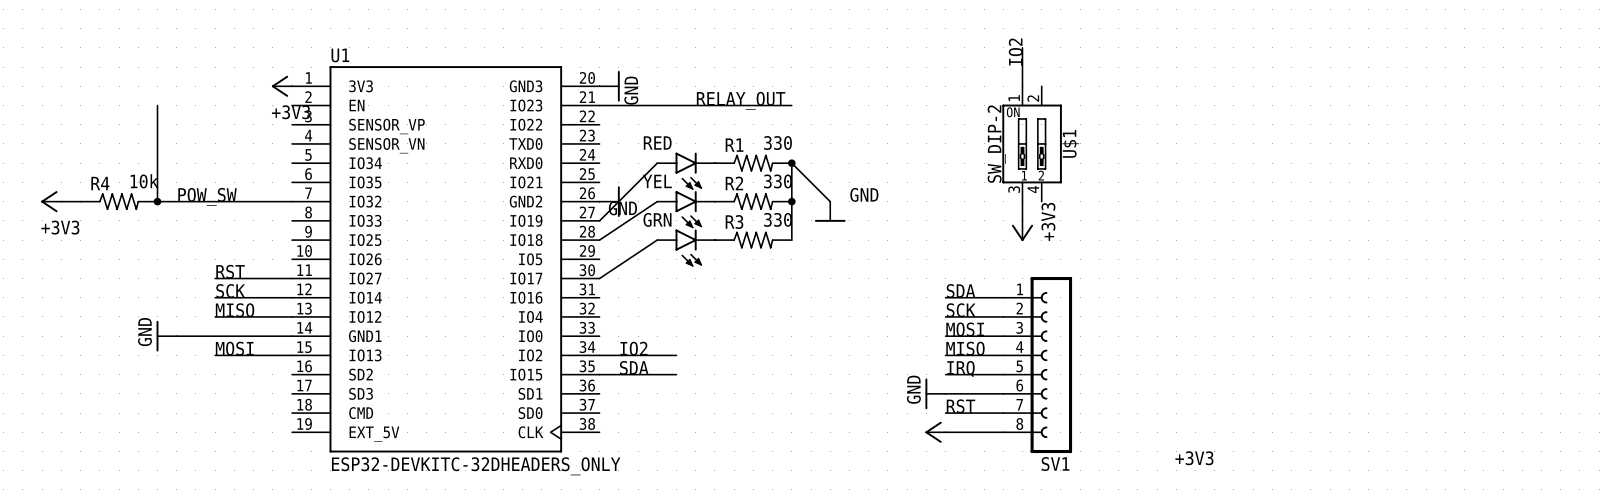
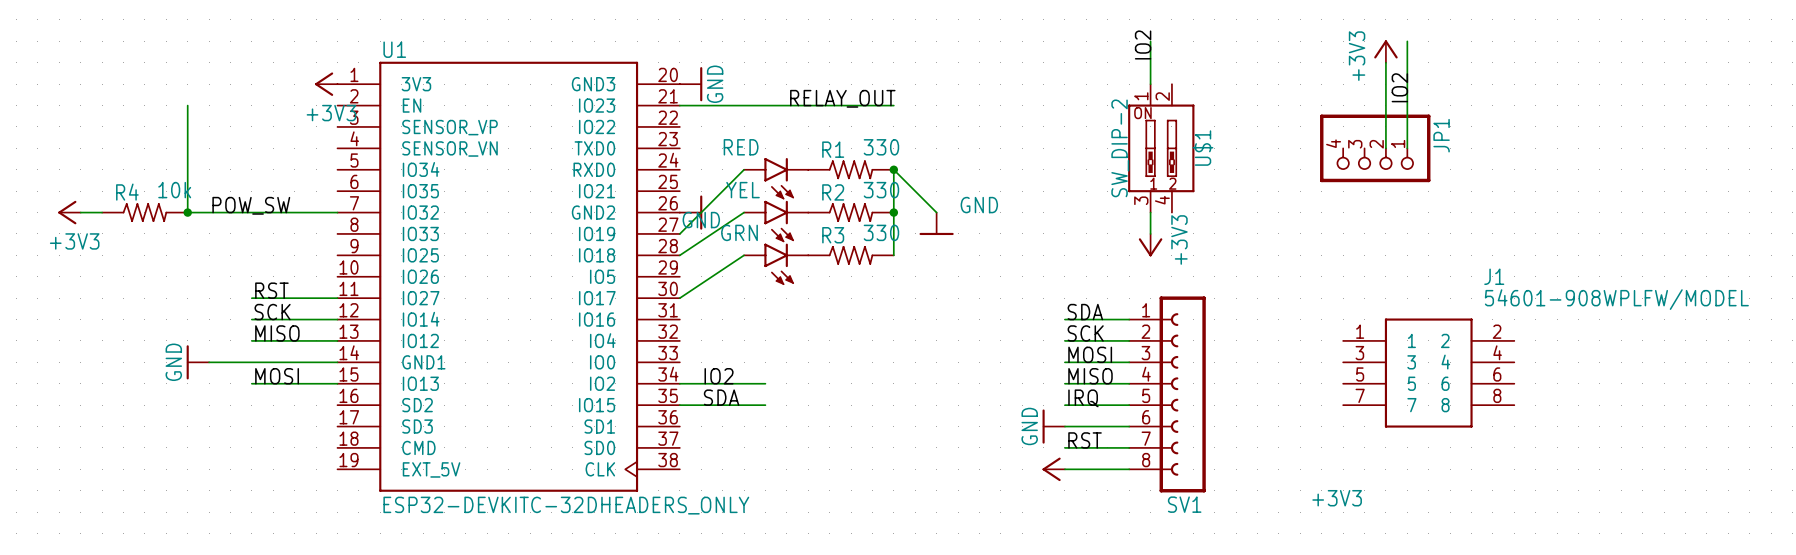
wire: none -> (1407, 41) (1407, 148)
power symbol: none -> +3V3 (1385, 51)
wire: none -> (1385, 62) (1385, 148)
label: none -> IO2 (1399, 87)
JP1: none -> (1375, 148)
J1: none -> 54601-908WPLFW/MODEL (1428, 373)

